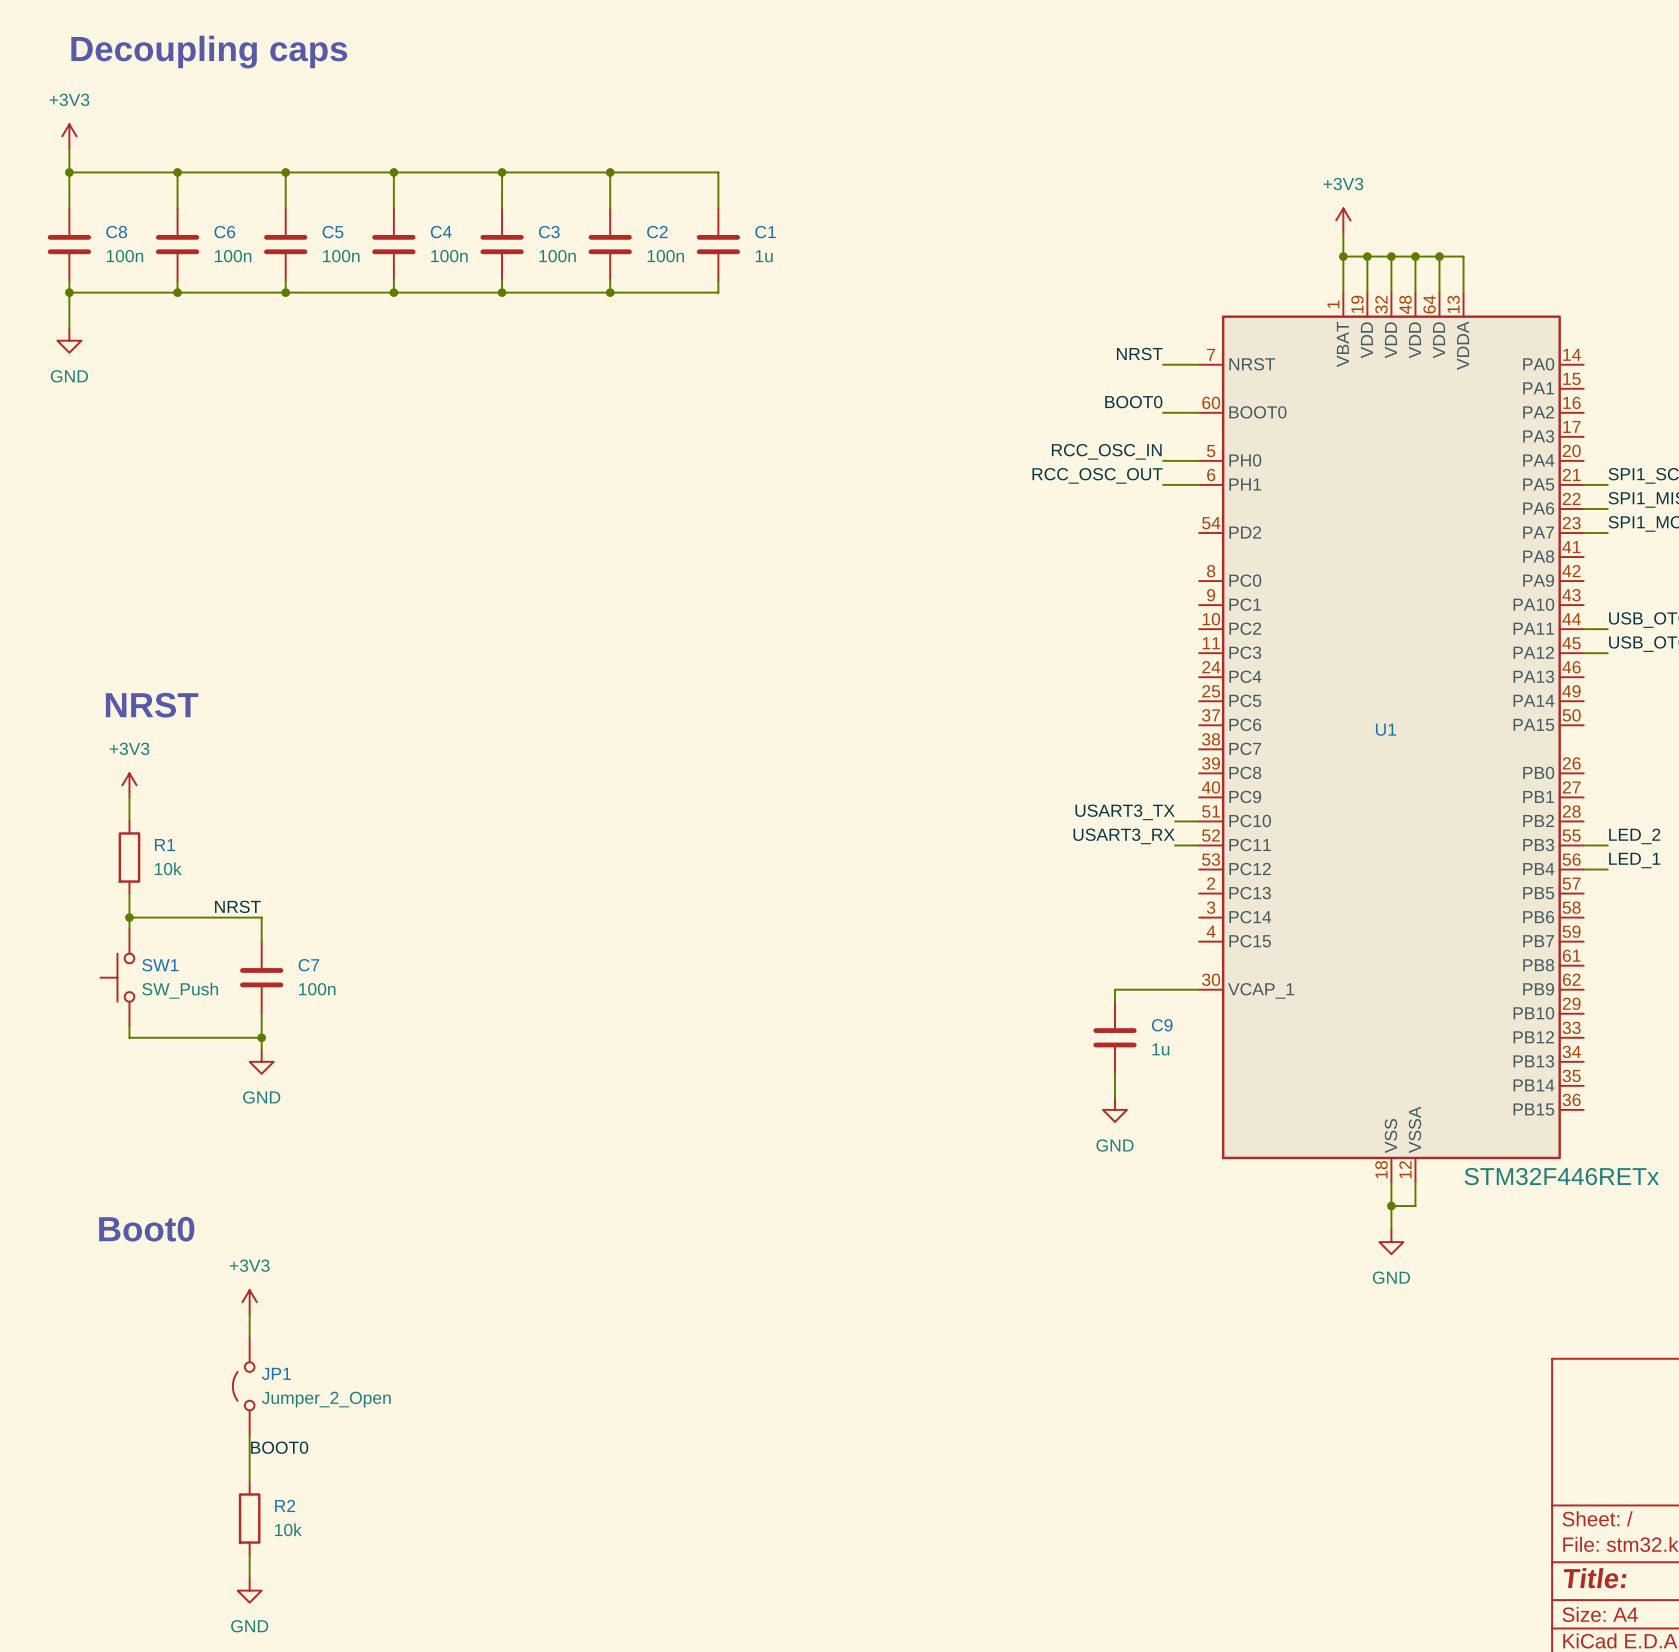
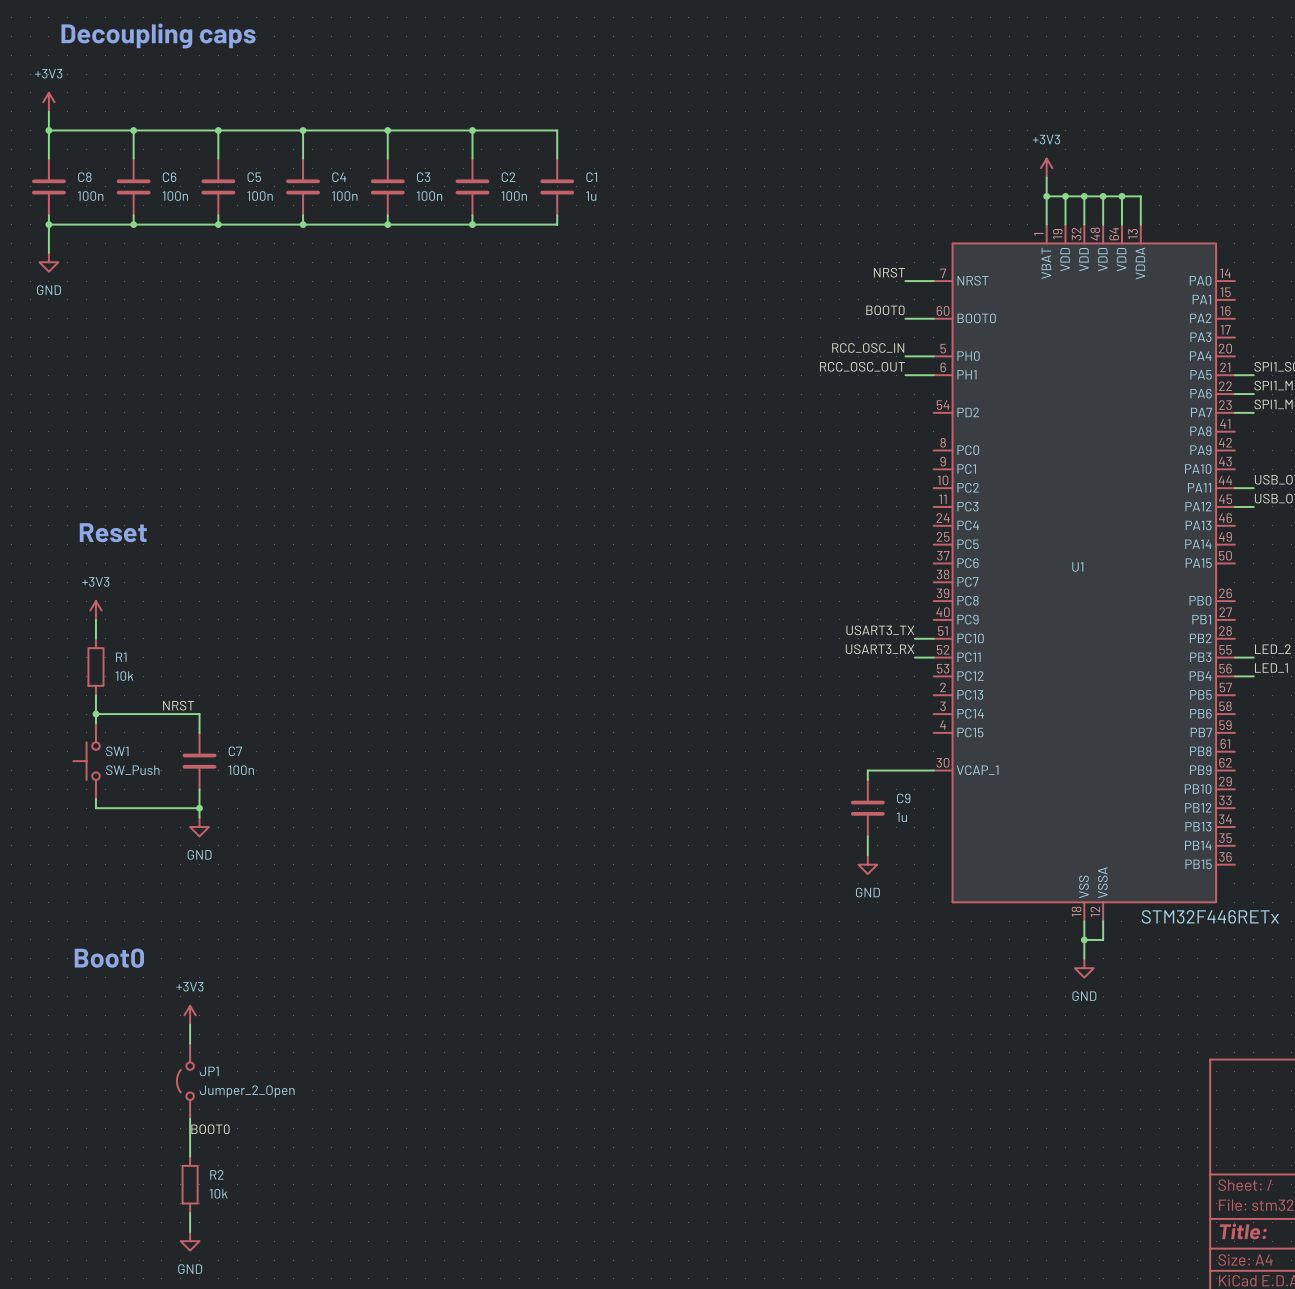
text: none -> Reset (113, 532)
text: NRST (152, 705) -> none

